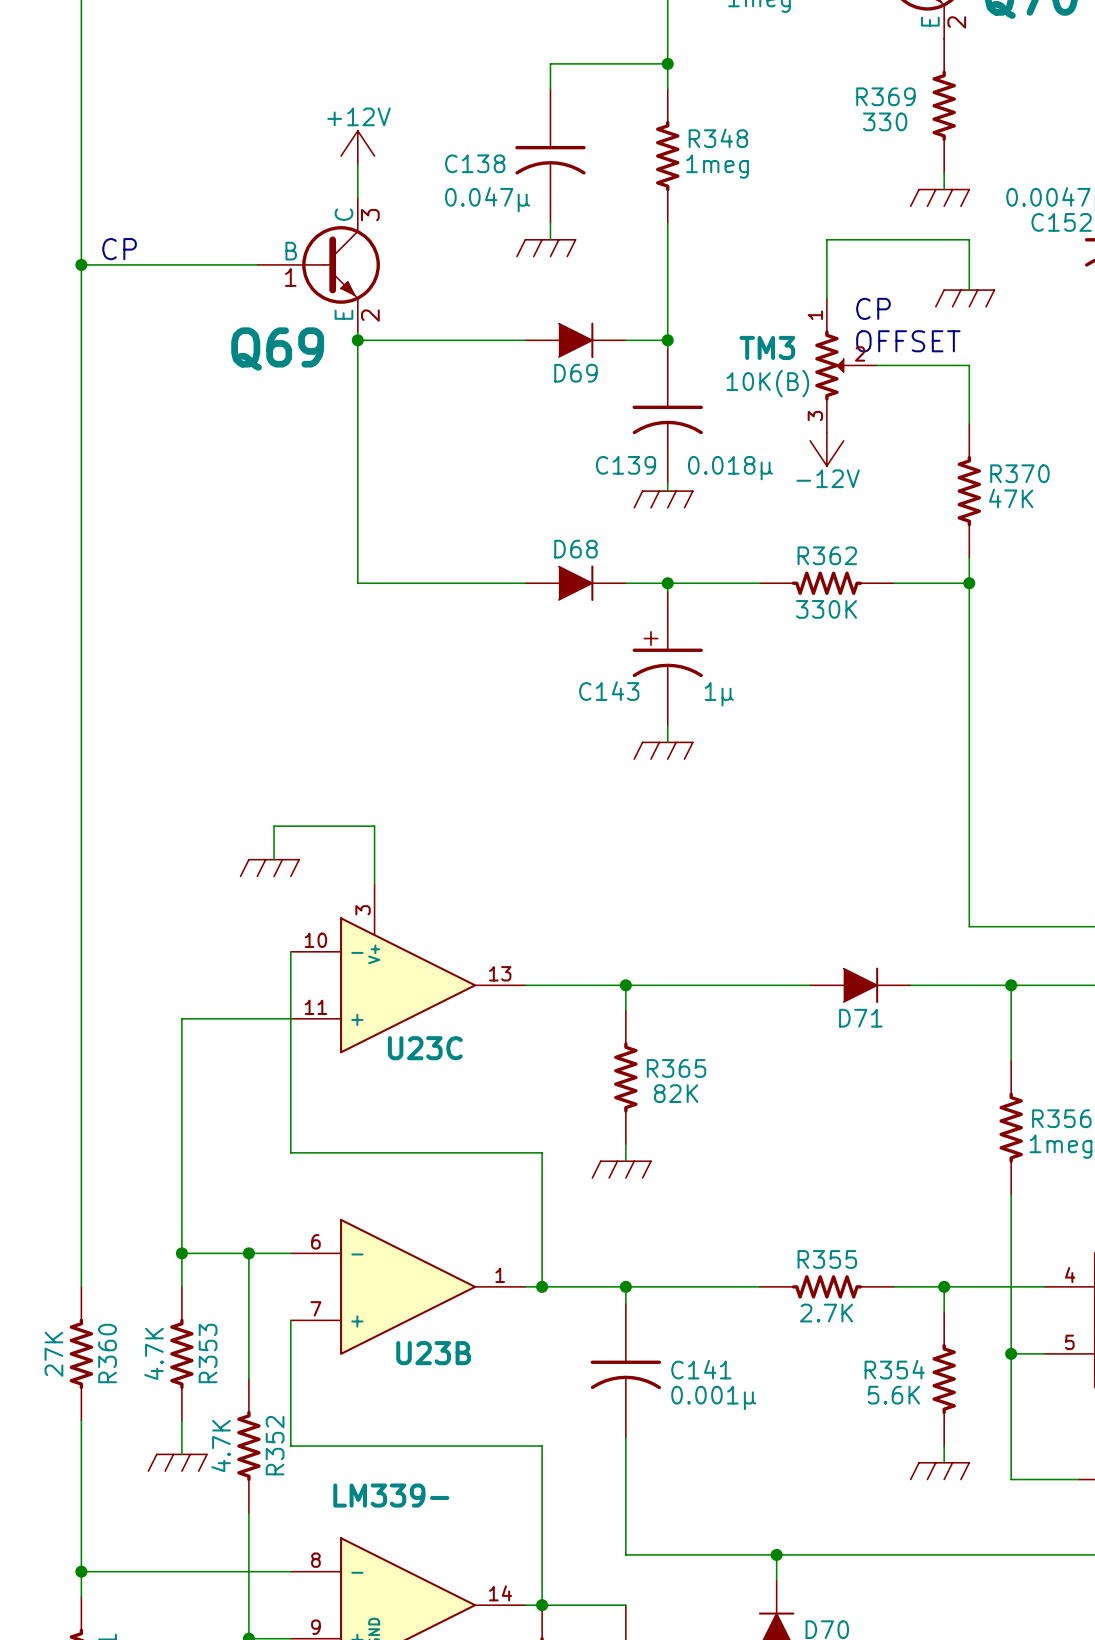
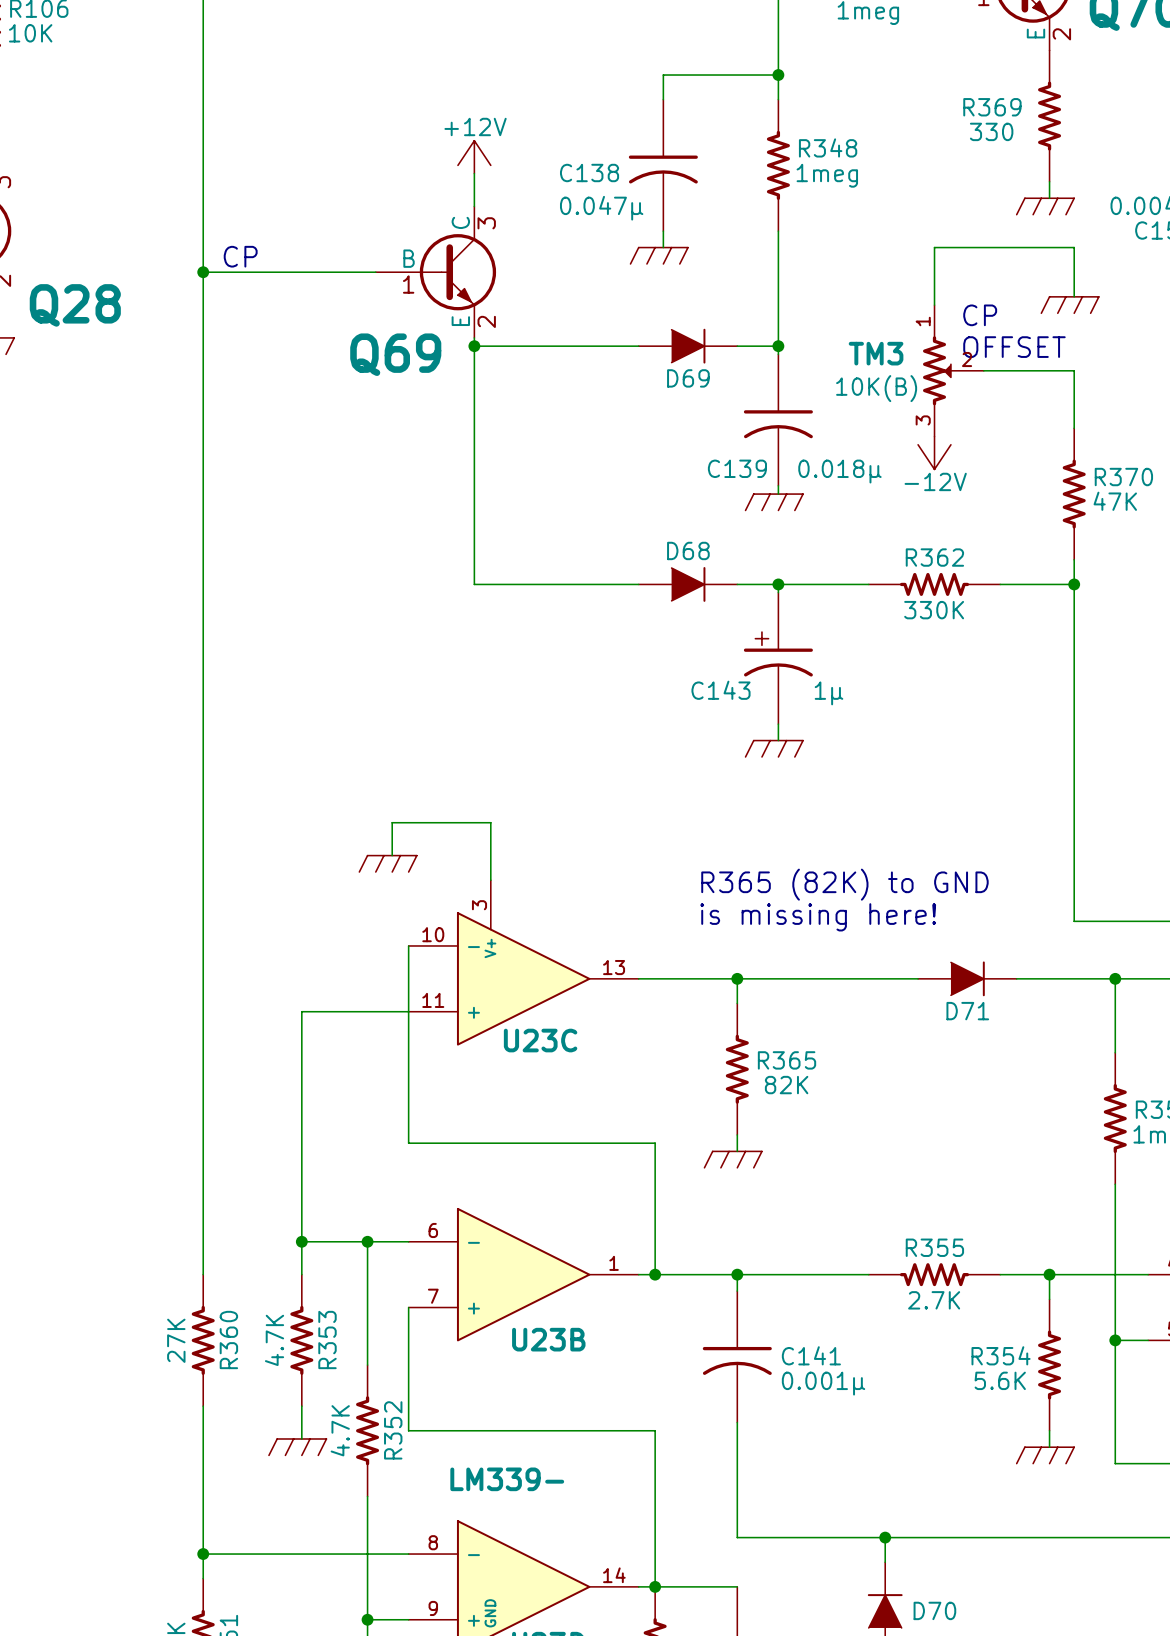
text: none -> R365 (82K) to GND (844, 884)
text: none -> is missing here! (818, 917)

